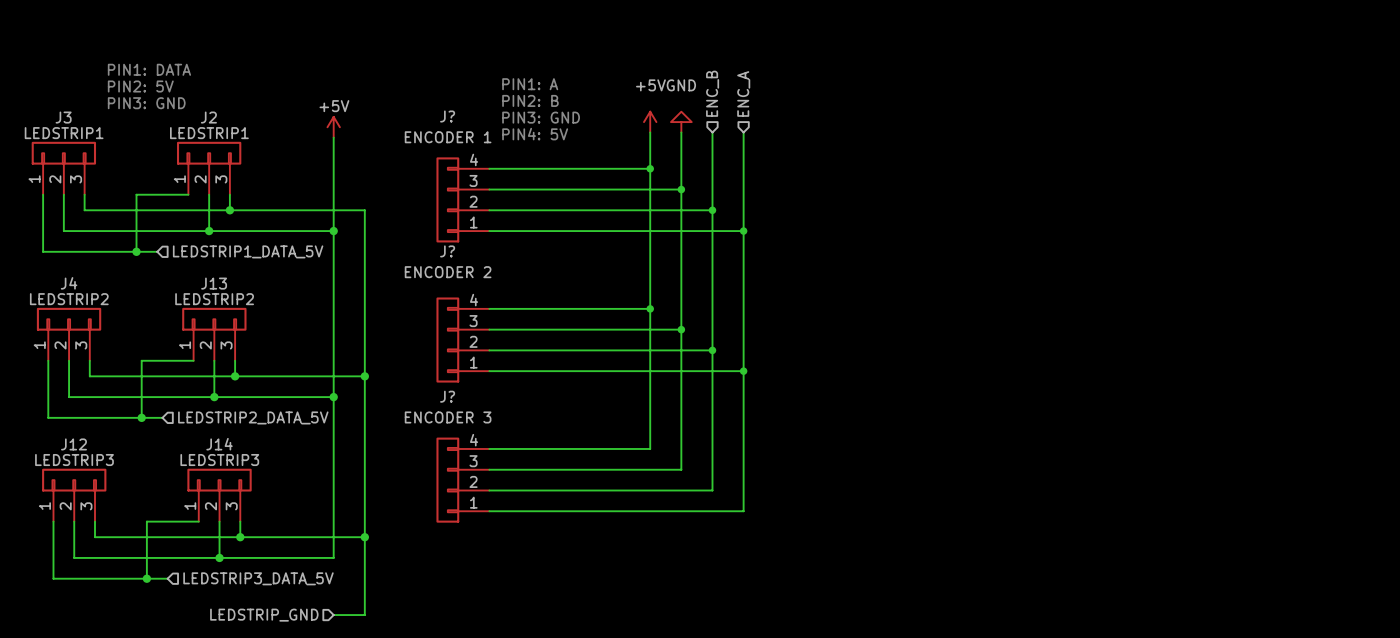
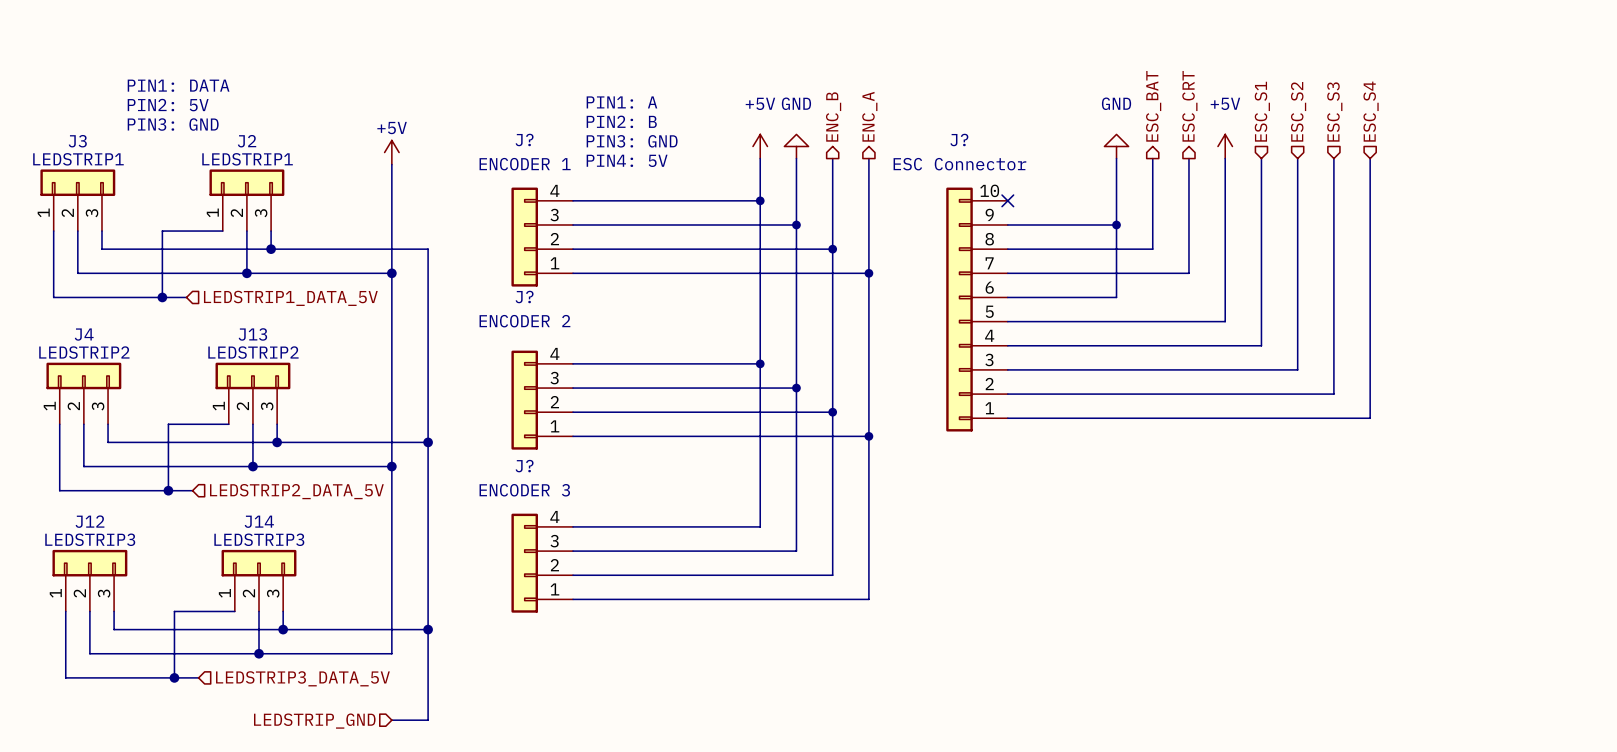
hierarchical label: none -> ESC_CRT (1189, 106)
hierarchical label: none -> ESC_BAT (1153, 106)
hierarchical label: none -> ESC_S1 (1262, 111)
hierarchical label: none -> ESC_S2 (1298, 111)
hierarchical label: none -> ESC_S3 (1334, 112)
hierarchical label: none -> ESC_S4 (1371, 111)
hierarchical label shape: input (712, 93) -> output (833, 116)
hierarchical label shape: input (743, 94) -> output (869, 116)
power symbol: none -> GND (1116, 146)
power symbol: none -> +5V (1225, 146)
wire: none -> (1116, 158) (1116, 297) (1007, 297)
wire: none -> (1152, 158) (1152, 249) (1007, 249)
wire: none -> (1188, 158) (1188, 273) (1007, 273)
wire: none -> (1225, 158) (1225, 321) (1007, 321)
wire: none -> (1261, 158) (1261, 345) (1007, 345)
wire: none -> (1297, 158) (1297, 369) (1007, 369)
wire: none -> (1333, 158) (1333, 394) (1007, 394)
wire: none -> (1370, 158) (1370, 418) (1007, 418)
no-connect mark: none -> (1007, 200)
wire: none -> (1007, 224) (1116, 224)
junction: none -> (1116, 224)
J?: none -> ESC Connector (977, 309)

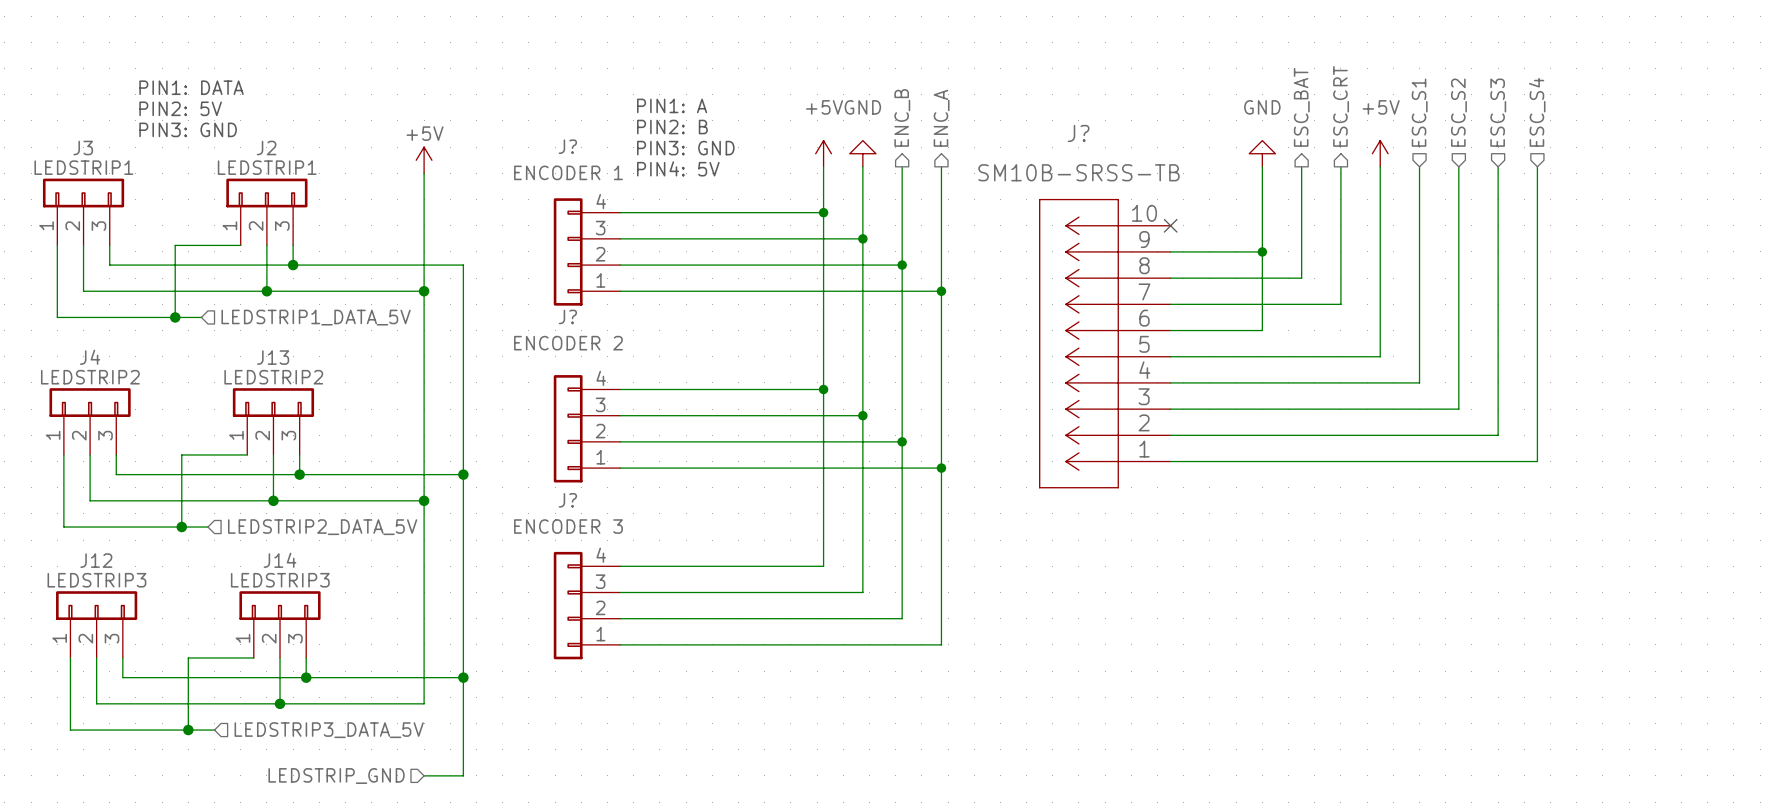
hierarchical label position: ESC_BAT (1153, 106) -> ESC_BAT (1301, 107)
hierarchical label position: ESC_CRT (1189, 106) -> ESC_CRT (1341, 106)
hierarchical label position: ESC_S1 (1262, 111) -> ESC_S1 (1419, 112)
hierarchical label position: ESC_S2 (1298, 111) -> ESC_S2 (1458, 112)
hierarchical label position: ESC_S4 (1371, 111) -> ESC_S4 (1537, 112)
hierarchical label position: ESC_S3 (1334, 112) -> ESC_S3 (1498, 112)
power symbol position: GND (1116, 146) -> GND (1262, 153)
power symbol position: +5V (1225, 146) -> +5V (1380, 153)
wire: (1116, 158) (1116, 297) (1007, 297) -> none
wire: (1152, 158) (1152, 249) (1007, 249) -> none
wire: none -> (1262, 166) (1262, 330) (1170, 330)
wire: (1188, 158) (1188, 273) (1007, 273) -> none
wire: none -> (1301, 166) (1301, 278) (1170, 278)
wire: (1225, 158) (1225, 321) (1007, 321) -> none
wire: none -> (1340, 166) (1340, 304) (1170, 304)
wire: (1261, 158) (1261, 345) (1007, 345) -> none
wire: none -> (1380, 166) (1380, 356) (1170, 356)
wire: (1297, 158) (1297, 369) (1007, 369) -> none
wire: none -> (1419, 166) (1419, 382) (1170, 382)
wire: (1333, 158) (1333, 394) (1007, 394) -> none
wire: none -> (1458, 166) (1458, 409) (1170, 409)
wire: (1370, 158) (1370, 418) (1007, 418) -> none
wire: none -> (1498, 166) (1498, 435) (1170, 435)
wire: none -> (1537, 166) (1537, 461) (1170, 461)
no-connect mark: (1007, 200) -> none
no-connect mark: none -> (1170, 225)
wire: (1007, 224) (1116, 224) -> none
junction position: (1116, 224) -> (1262, 251)
wire: none -> (1170, 251) (1262, 251)
J?: ESC Connector (977, 309) -> none
J?: none -> SM10B-SRSS-TB (1104, 343)

